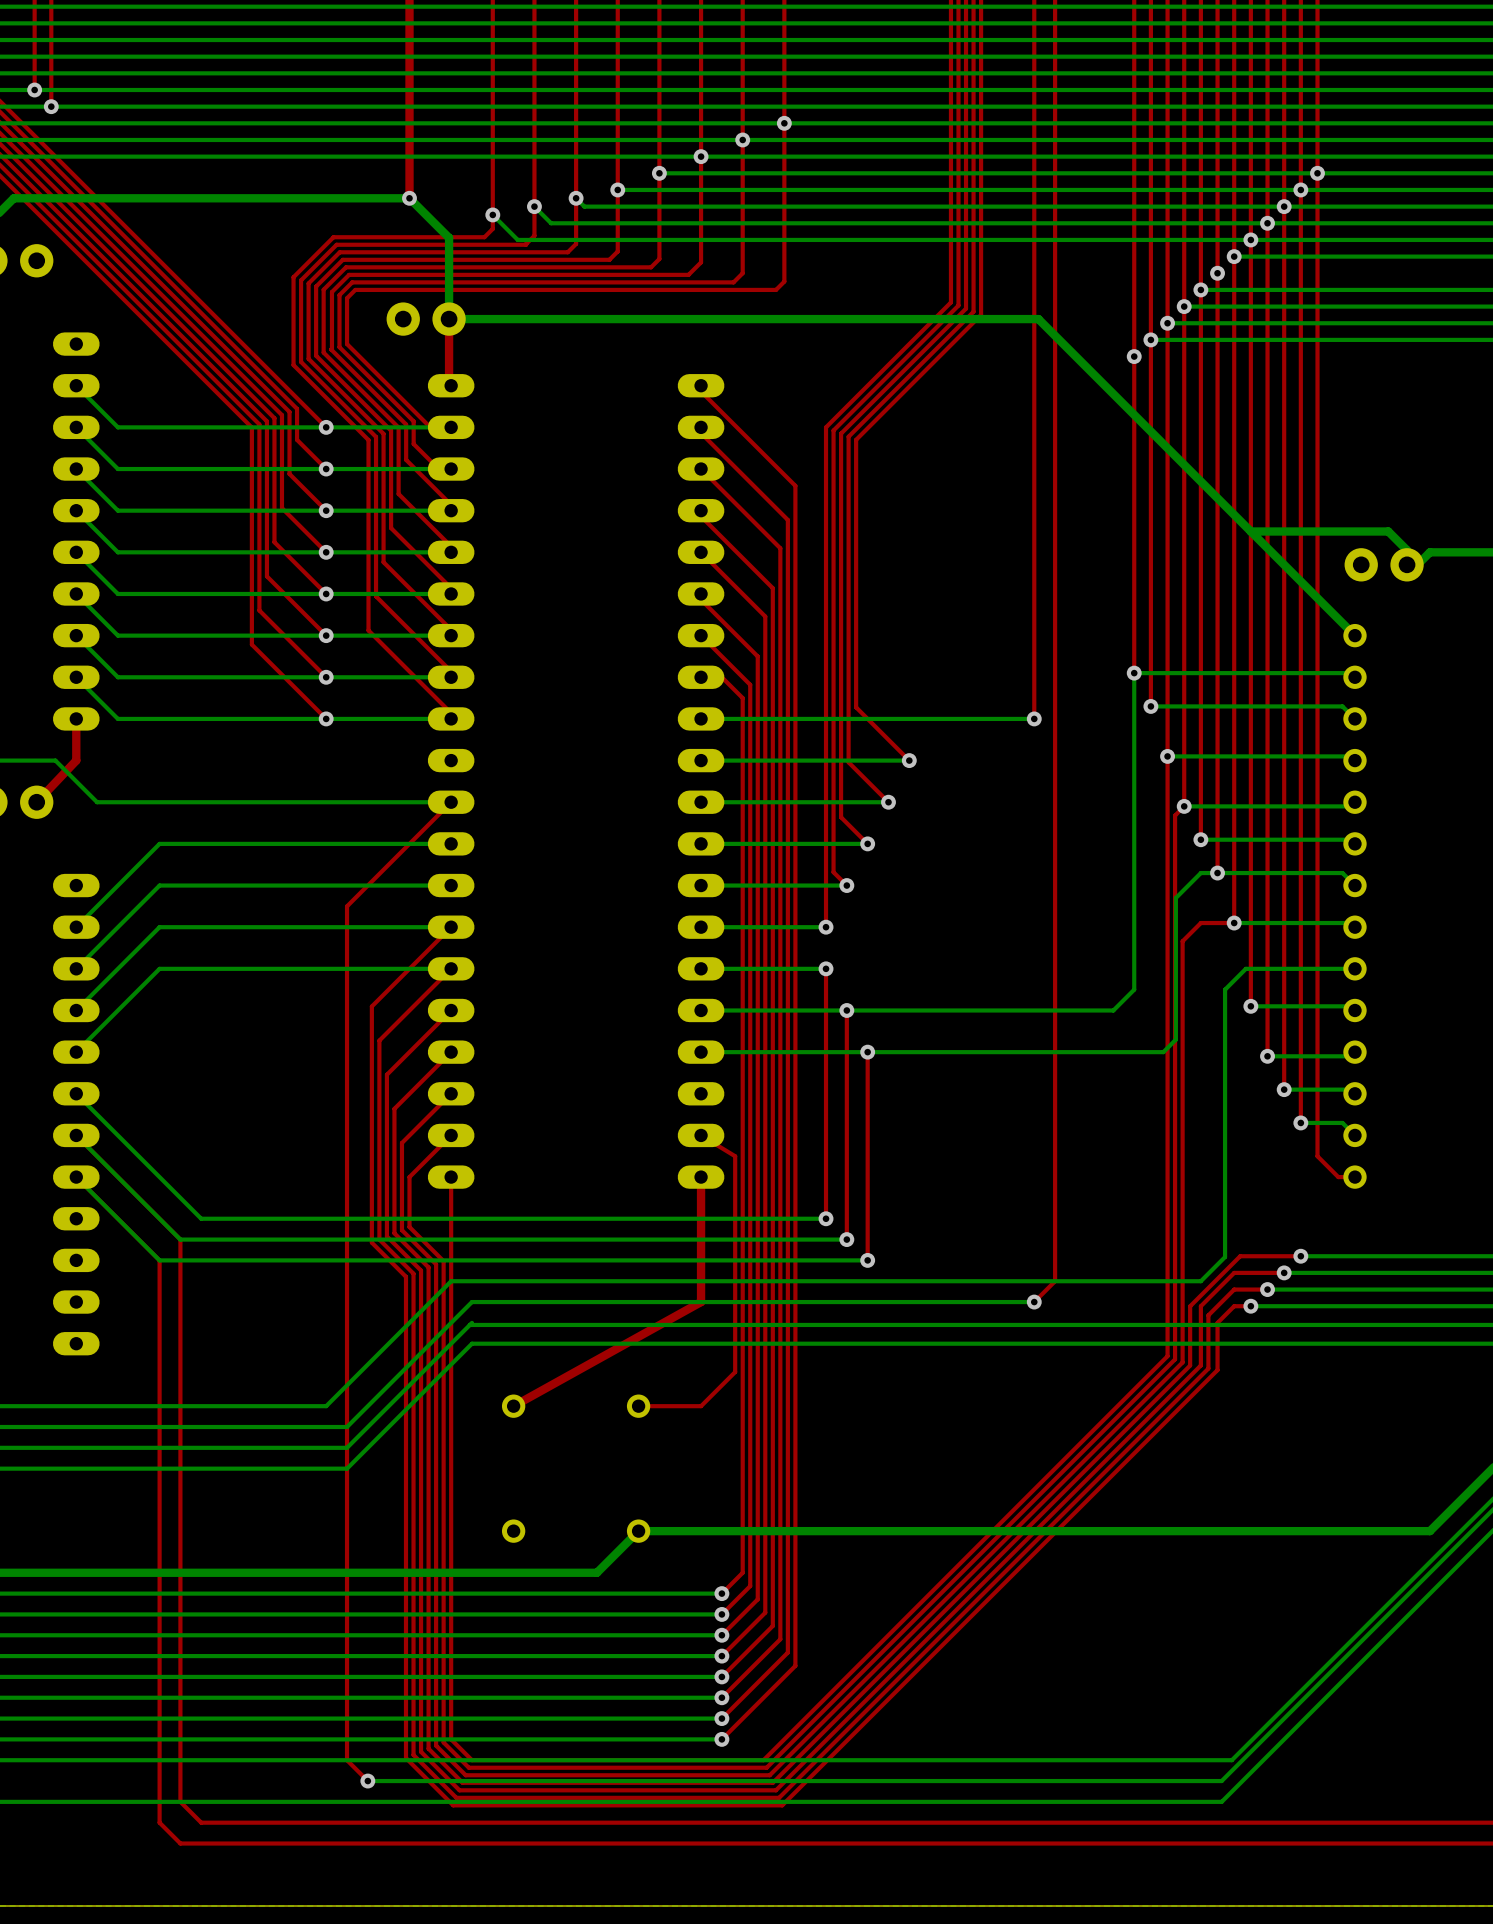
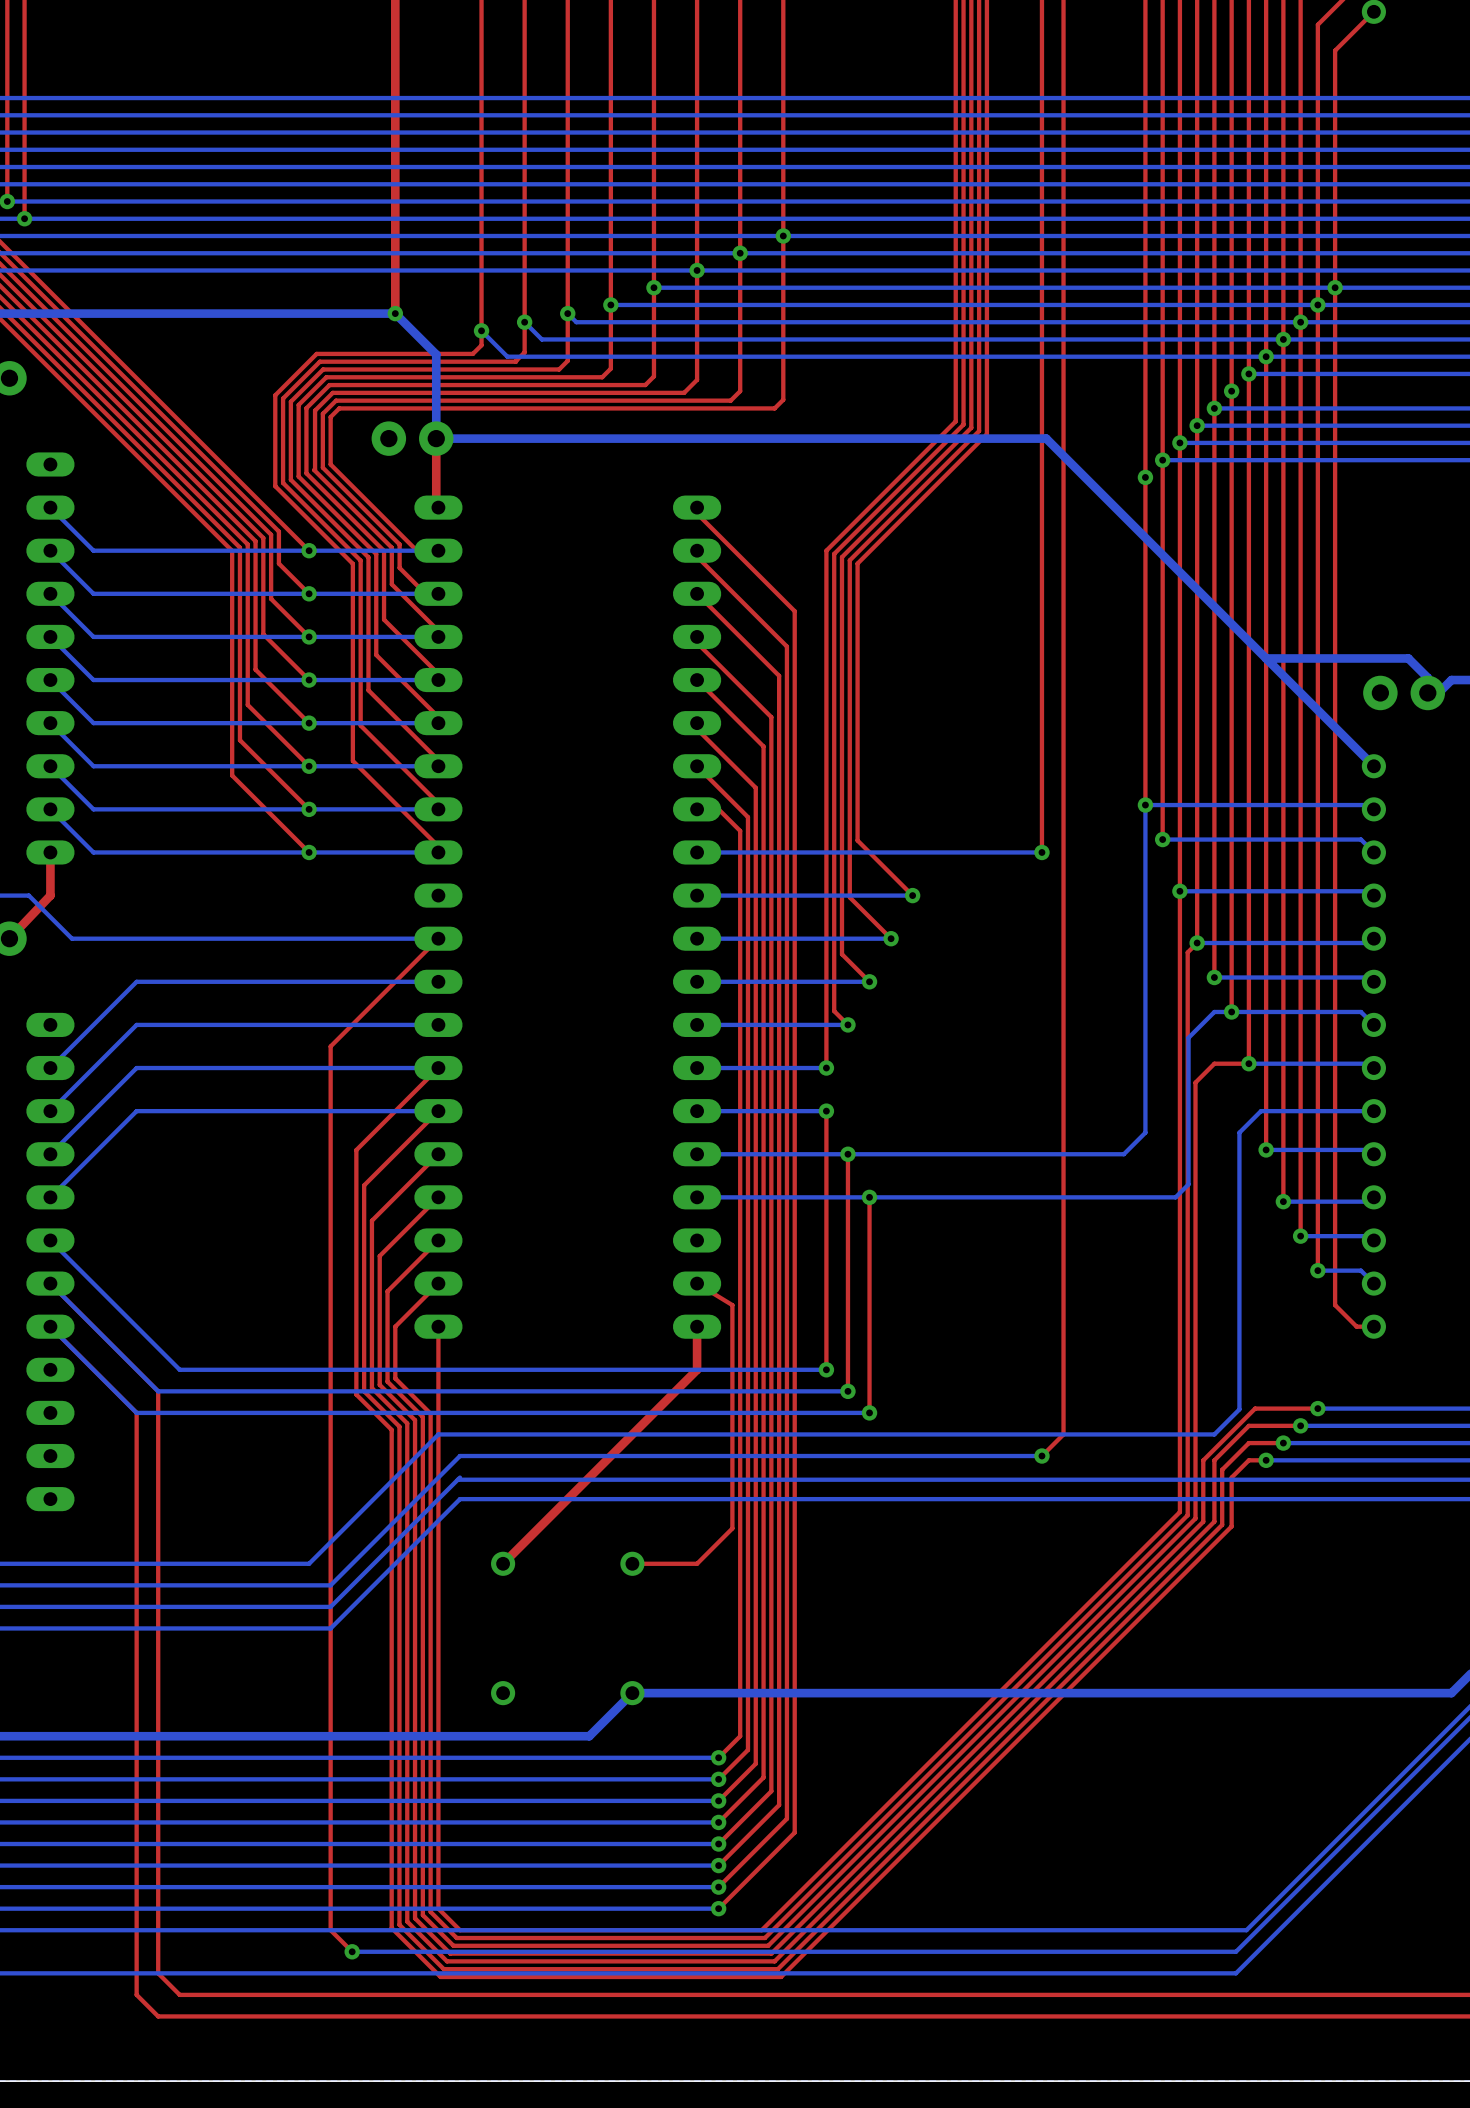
top track: (701, 1218) (701, 1302) (513, 1406) -> (697, 1369) (503, 1563)

